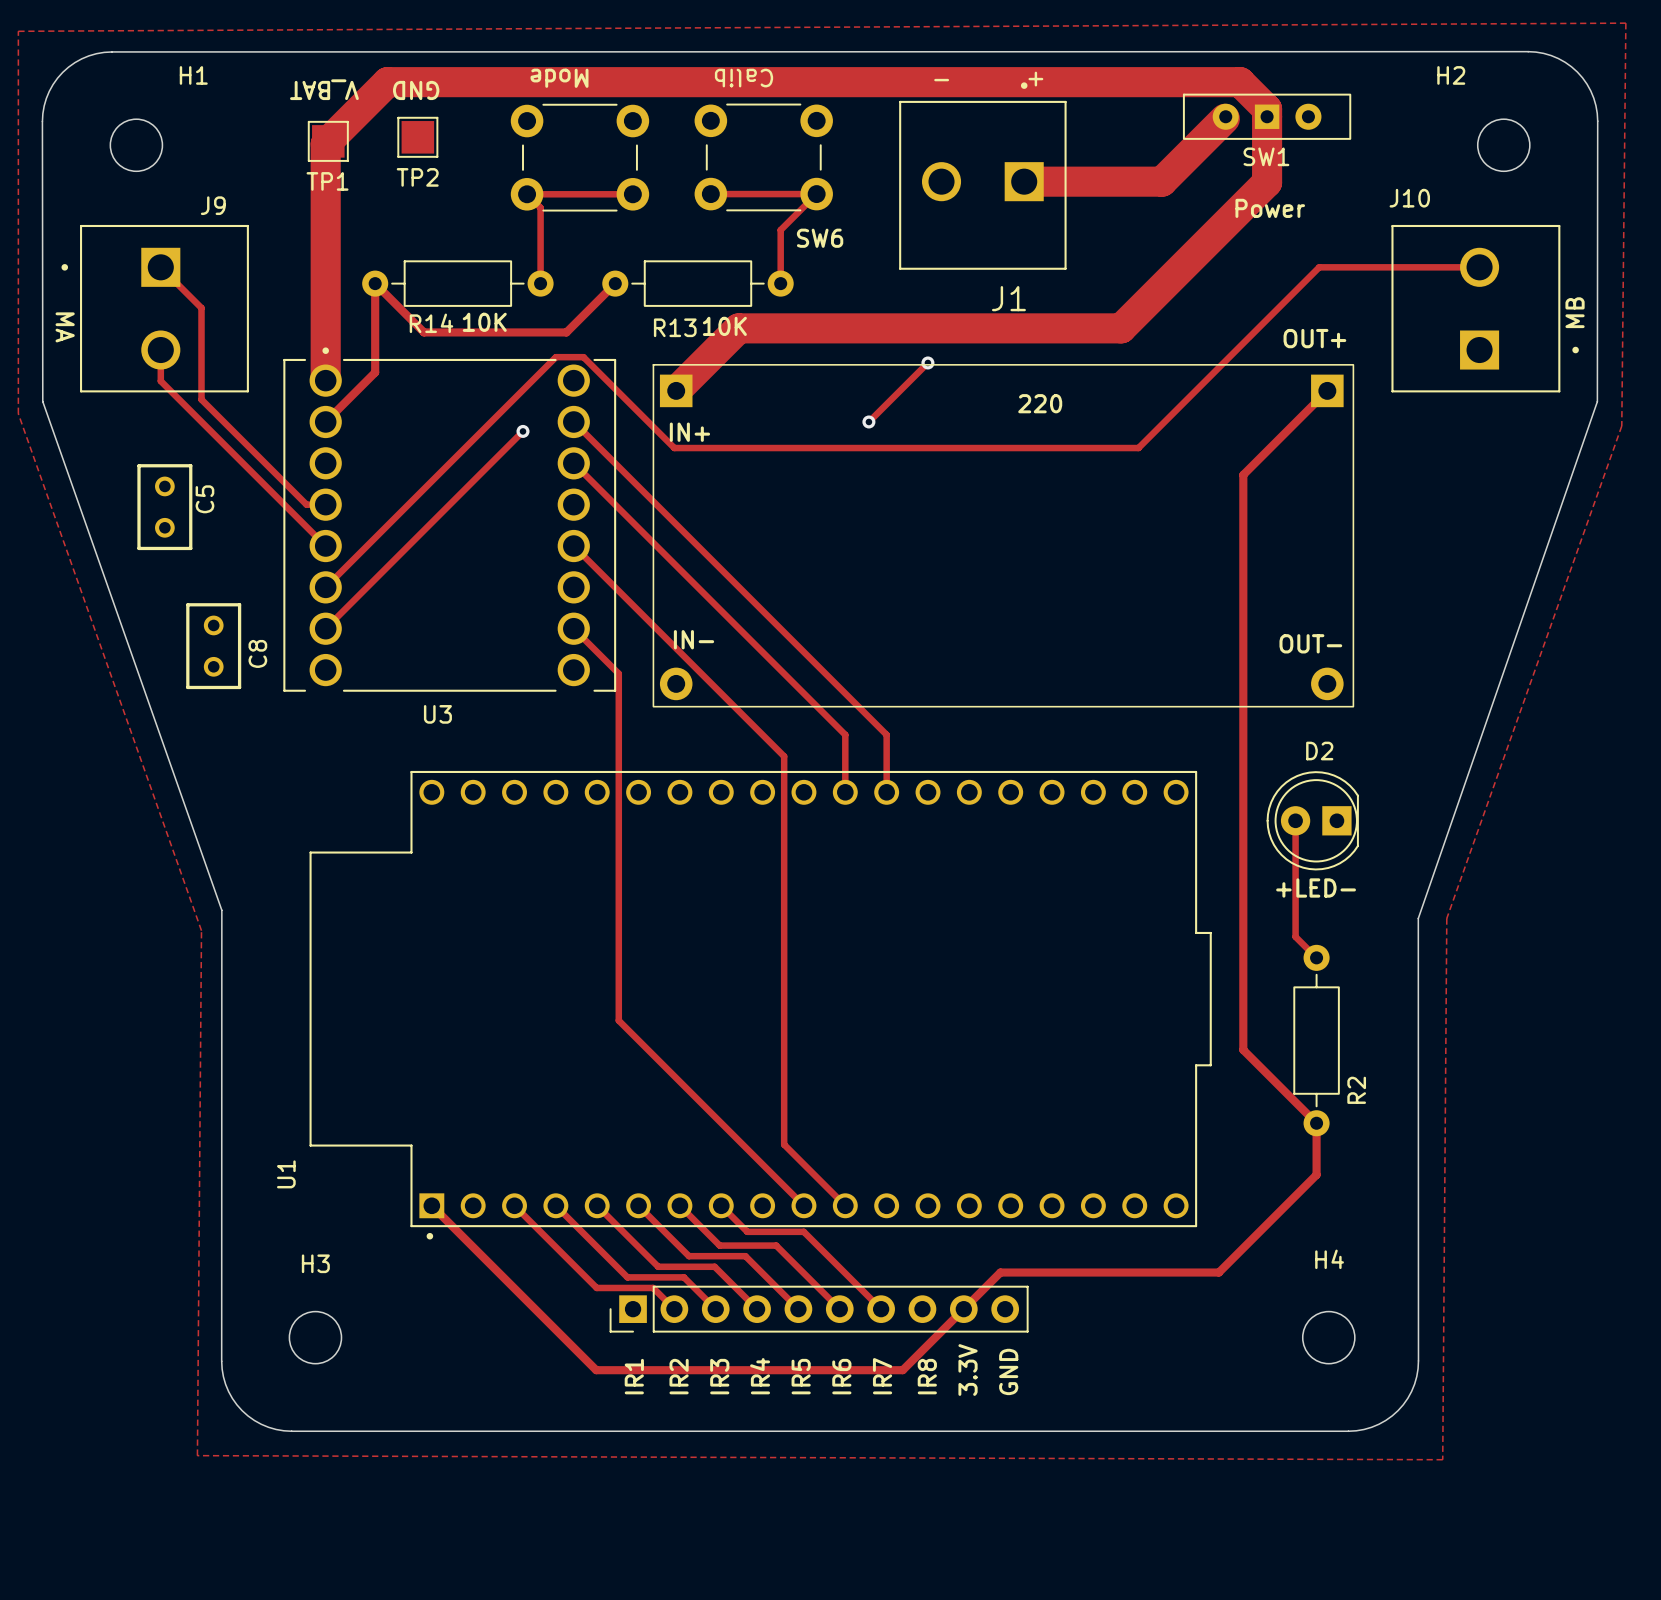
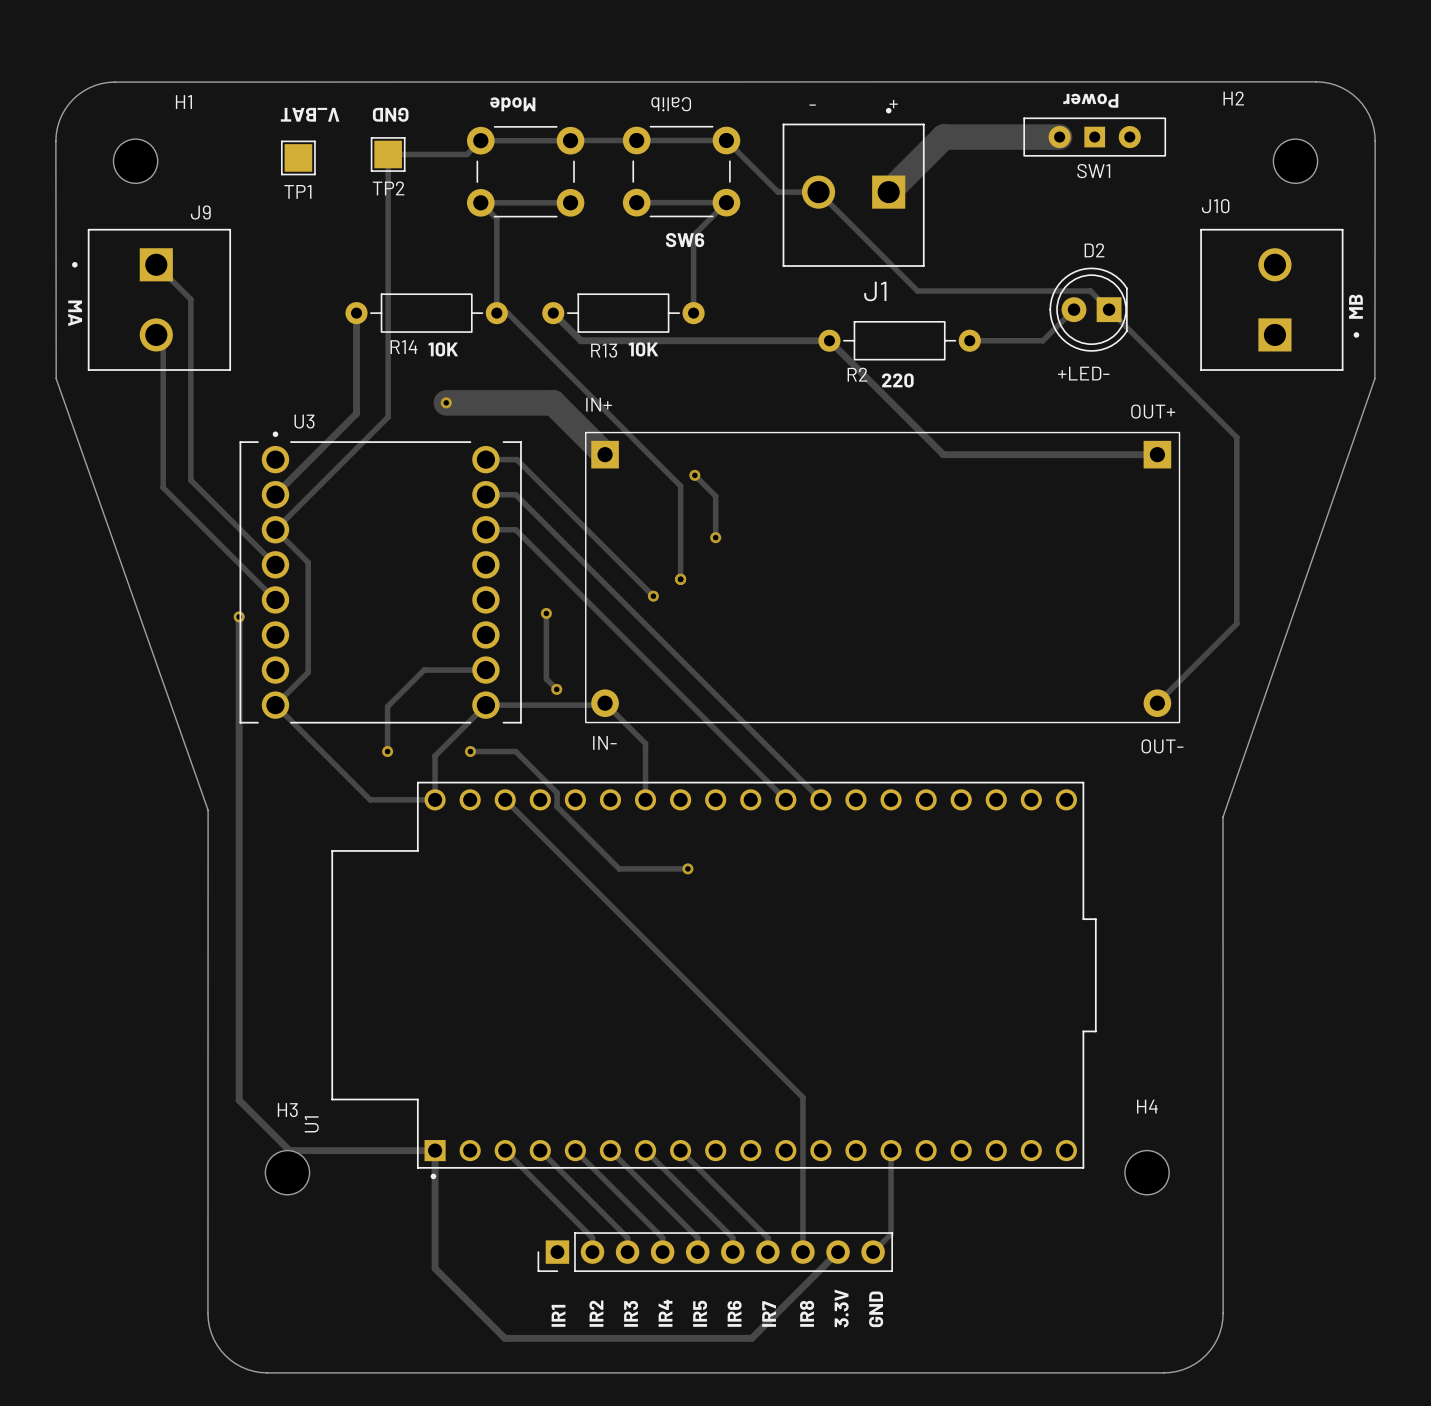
zone outline: (1625, 23) (18, 31) (18, 413) (201, 930) (197, 1455) (1442, 1459) (1446, 918) (1621, 426) (1625, 23) -> none
H2 name position: H2 (1451, 75) -> H2 (1233, 98)
text position: Mode (559, 78) -> Mode (512, 104)
text position: Calib (744, 78) -> Calib (671, 104)
text position: V_BAT (324, 89) -> V_BAT (310, 114)
text position: GND (416, 90) -> GND (390, 114)
track: (1224, 118) (1162, 181) (1024, 181) -> (1059, 137) (943, 137) (888, 192)
track: none -> (570, 140) (726, 140) (778, 192) (818, 192) (917, 291) (1090, 291) (1236, 437) (1236, 623) (1157, 703)
track: none -> (570, 140) (480, 140) (466, 154) (388, 154) (388, 417) (275, 529) (308, 562) (308, 672) (275, 705) (370, 799) (435, 799) (435, 755) (487, 703)
TP2 position: (417, 137) -> (388, 154)
part position: (579, 157) -> (525, 171)
SW6 position: (763, 157) -> (681, 171)
track: (543, 194) (527, 194) (540, 207) (540, 283) -> (480, 202) (496, 218) (496, 313) (507, 313) (680, 485) (680, 579)
track: (816, 194) (780, 230) (780, 283) -> (712, 202) (726, 202) (693, 235) (693, 313)
text rotation: 0° (1270, 208) -> 180° (1090, 100)
text position: Power (1270, 208) -> Power (1090, 100)
SW6 name position: SW6 (820, 238) -> SW6 (685, 240)
track: (1479, 267) (1319, 267) (1138, 448) (674, 448) (583, 357) (555, 357) (325, 587) -> none
R14 position: (457, 283) -> (426, 313)
track: (615, 283) (566, 332) (424, 332) (375, 283) (375, 372) (325, 421) -> none
R13 position: (697, 283) -> (623, 313)
track: none -> (1074, 309) (1042, 340) (969, 340)
text position: 10K (484, 322) -> 10K (443, 349)
track: none -> (356, 313) (356, 413) (275, 494)
track: none -> (553, 313) (580, 340) (829, 340) (943, 454) (1157, 454)
text position: 10K (724, 326) -> 10K (643, 349)
text position: OUT+ (1314, 338) -> OUT+ (1153, 411)
track: (160, 350) (160, 381) (325, 546) -> none
track: none -> (163, 341) (163, 487) (275, 599)
track: (927, 362) (868, 421) -> none
via: (927, 362) -> none
track: (325, 380) (325, 143) (387, 82) (1240, 82) (1267, 109) (1267, 182) (1121, 328) (738, 328) (676, 390) -> none
track: (1327, 390) (1243, 474) (1243, 1050) (1316, 1123) (1316, 1174) (1218, 1272) (1000, 1272) (902, 1370) (596, 1370) (431, 1205) -> none
text: none -> +LED- (1083, 373)
track: (201, 399) (306, 504) (325, 504) -> (190, 376) (190, 480) (275, 564)
track: (573, 421) (886, 734) (886, 792) -> none
via: (868, 421) -> none
track: none -> (446, 402) (553, 402) (605, 454)
track: (523, 431) (325, 628) -> none
via position: (523, 431) -> (446, 402)
track: (573, 463) (845, 734) (845, 792) -> none
track: none -> (485, 459) (516, 459) (653, 596)
C5: (164, 507) -> none
track: none -> (694, 475) (715, 496) (715, 537)
via: none -> (694, 475)
U3 position: (449, 519) -> (380, 577)
part position: (1003, 535) -> (882, 577)
track: none -> (485, 494) (515, 494) (820, 799)
track: (573, 546) (784, 756) (784, 1144) (845, 1205) -> none
track: none -> (485, 529) (515, 529) (785, 799)
via: none -> (715, 537)
track: (573, 628) (618, 673) (618, 1020) (803, 1205) -> none
via: none -> (680, 579)
text position: IN- (693, 639) -> IN- (604, 742)
text position: OUT- (1310, 643) -> OUT- (1162, 746)
C8: (213, 646) -> none
via: none -> (653, 596)
track: none -> (546, 613) (546, 679) (556, 689)
via: none -> (546, 613)
track: none -> (239, 616) (239, 1100) (289, 1150) (435, 1150) (435, 1268) (504, 1338) (751, 1338) (838, 1252)
via: none -> (239, 616)
U3 name position: U3 (437, 714) -> U3 (304, 421)
track: none -> (485, 670) (424, 670) (387, 706) (387, 751)
via: none -> (556, 689)
track: none -> (485, 705) (603, 705) (605, 703) (645, 743) (645, 799)
track: (1295, 820) (1295, 936) (1316, 957) -> none
D2 position: (1312, 820) -> (1088, 309)
via: none -> (387, 751)
track: none -> (470, 751) (515, 751) (557, 792) (557, 806) (619, 868) (687, 868)
via: none -> (470, 751)
text: +LED- (1316, 887) -> none
track: none -> (505, 799) (802, 1097) (802, 1252)
board edge: (221, 910) (222, 1369) (228, 1391) (242, 1410) (254, 1420) (268, 1427) (291, 1431) (1348, 1431) (1364, 1429) (1378, 1424) (1392, 1415) (1403, 1404) (1414, 1384) (1418, 1368) (1418, 918) -> (208, 810) (208, 1320) (213, 1339) (225, 1355) (241, 1367) (267, 1372) (1163, 1372) (1176, 1371) (1195, 1363) (1214, 1344) (1221, 1326) (1223, 1313) (1223, 817)
via: none -> (687, 868)
U1 position: (760, 1005) -> (714, 980)
R2 rotation: 0° (1316, 1040) -> 90° clockwise (899, 340)
R2 position: (1316, 1040) -> (899, 340)
track: (514, 1205) (596, 1287) (653, 1287) (674, 1309) -> none
track: (555, 1205) (627, 1277) (683, 1277) (715, 1309) -> none
track: (597, 1205) (658, 1266) (714, 1266) (757, 1309) -> none
track: (638, 1205) (688, 1256) (745, 1256) (798, 1309) -> none
track: (679, 1205) (719, 1245) (776, 1245) (839, 1309) -> none
track: (721, 1205) (747, 1231) (803, 1231) (881, 1309) -> none
part position: (819, 1309) -> (715, 1252)
track: none -> (505, 1150) (592, 1237) (592, 1252)
track: none -> (540, 1150) (627, 1237) (627, 1252)
track: none -> (575, 1150) (662, 1237) (662, 1252)
track: none -> (610, 1150) (697, 1237) (697, 1252)
track: none -> (645, 1150) (732, 1237) (732, 1252)
track: none -> (680, 1150) (767, 1237) (767, 1252)
track: none -> (891, 1150) (891, 1234) (873, 1252)
text position: 3.3V (968, 1370) -> 3.3V (841, 1308)
text position: GND (1008, 1371) -> GND (876, 1309)
text position: IR1 (634, 1376) -> IR1 (558, 1315)
text position: IR2 (679, 1376) -> IR2 (596, 1313)
text position: IR3 (719, 1376) -> IR3 (631, 1313)
text position: IR4 (760, 1376) -> IR4 (665, 1313)
text position: IR5 (801, 1376) -> IR5 (700, 1313)
text position: IR6 (841, 1376) -> IR6 (734, 1313)
text position: IR7 (882, 1376) -> IR7 (769, 1314)
text position: IR8 (927, 1376) -> IR8 (807, 1313)

